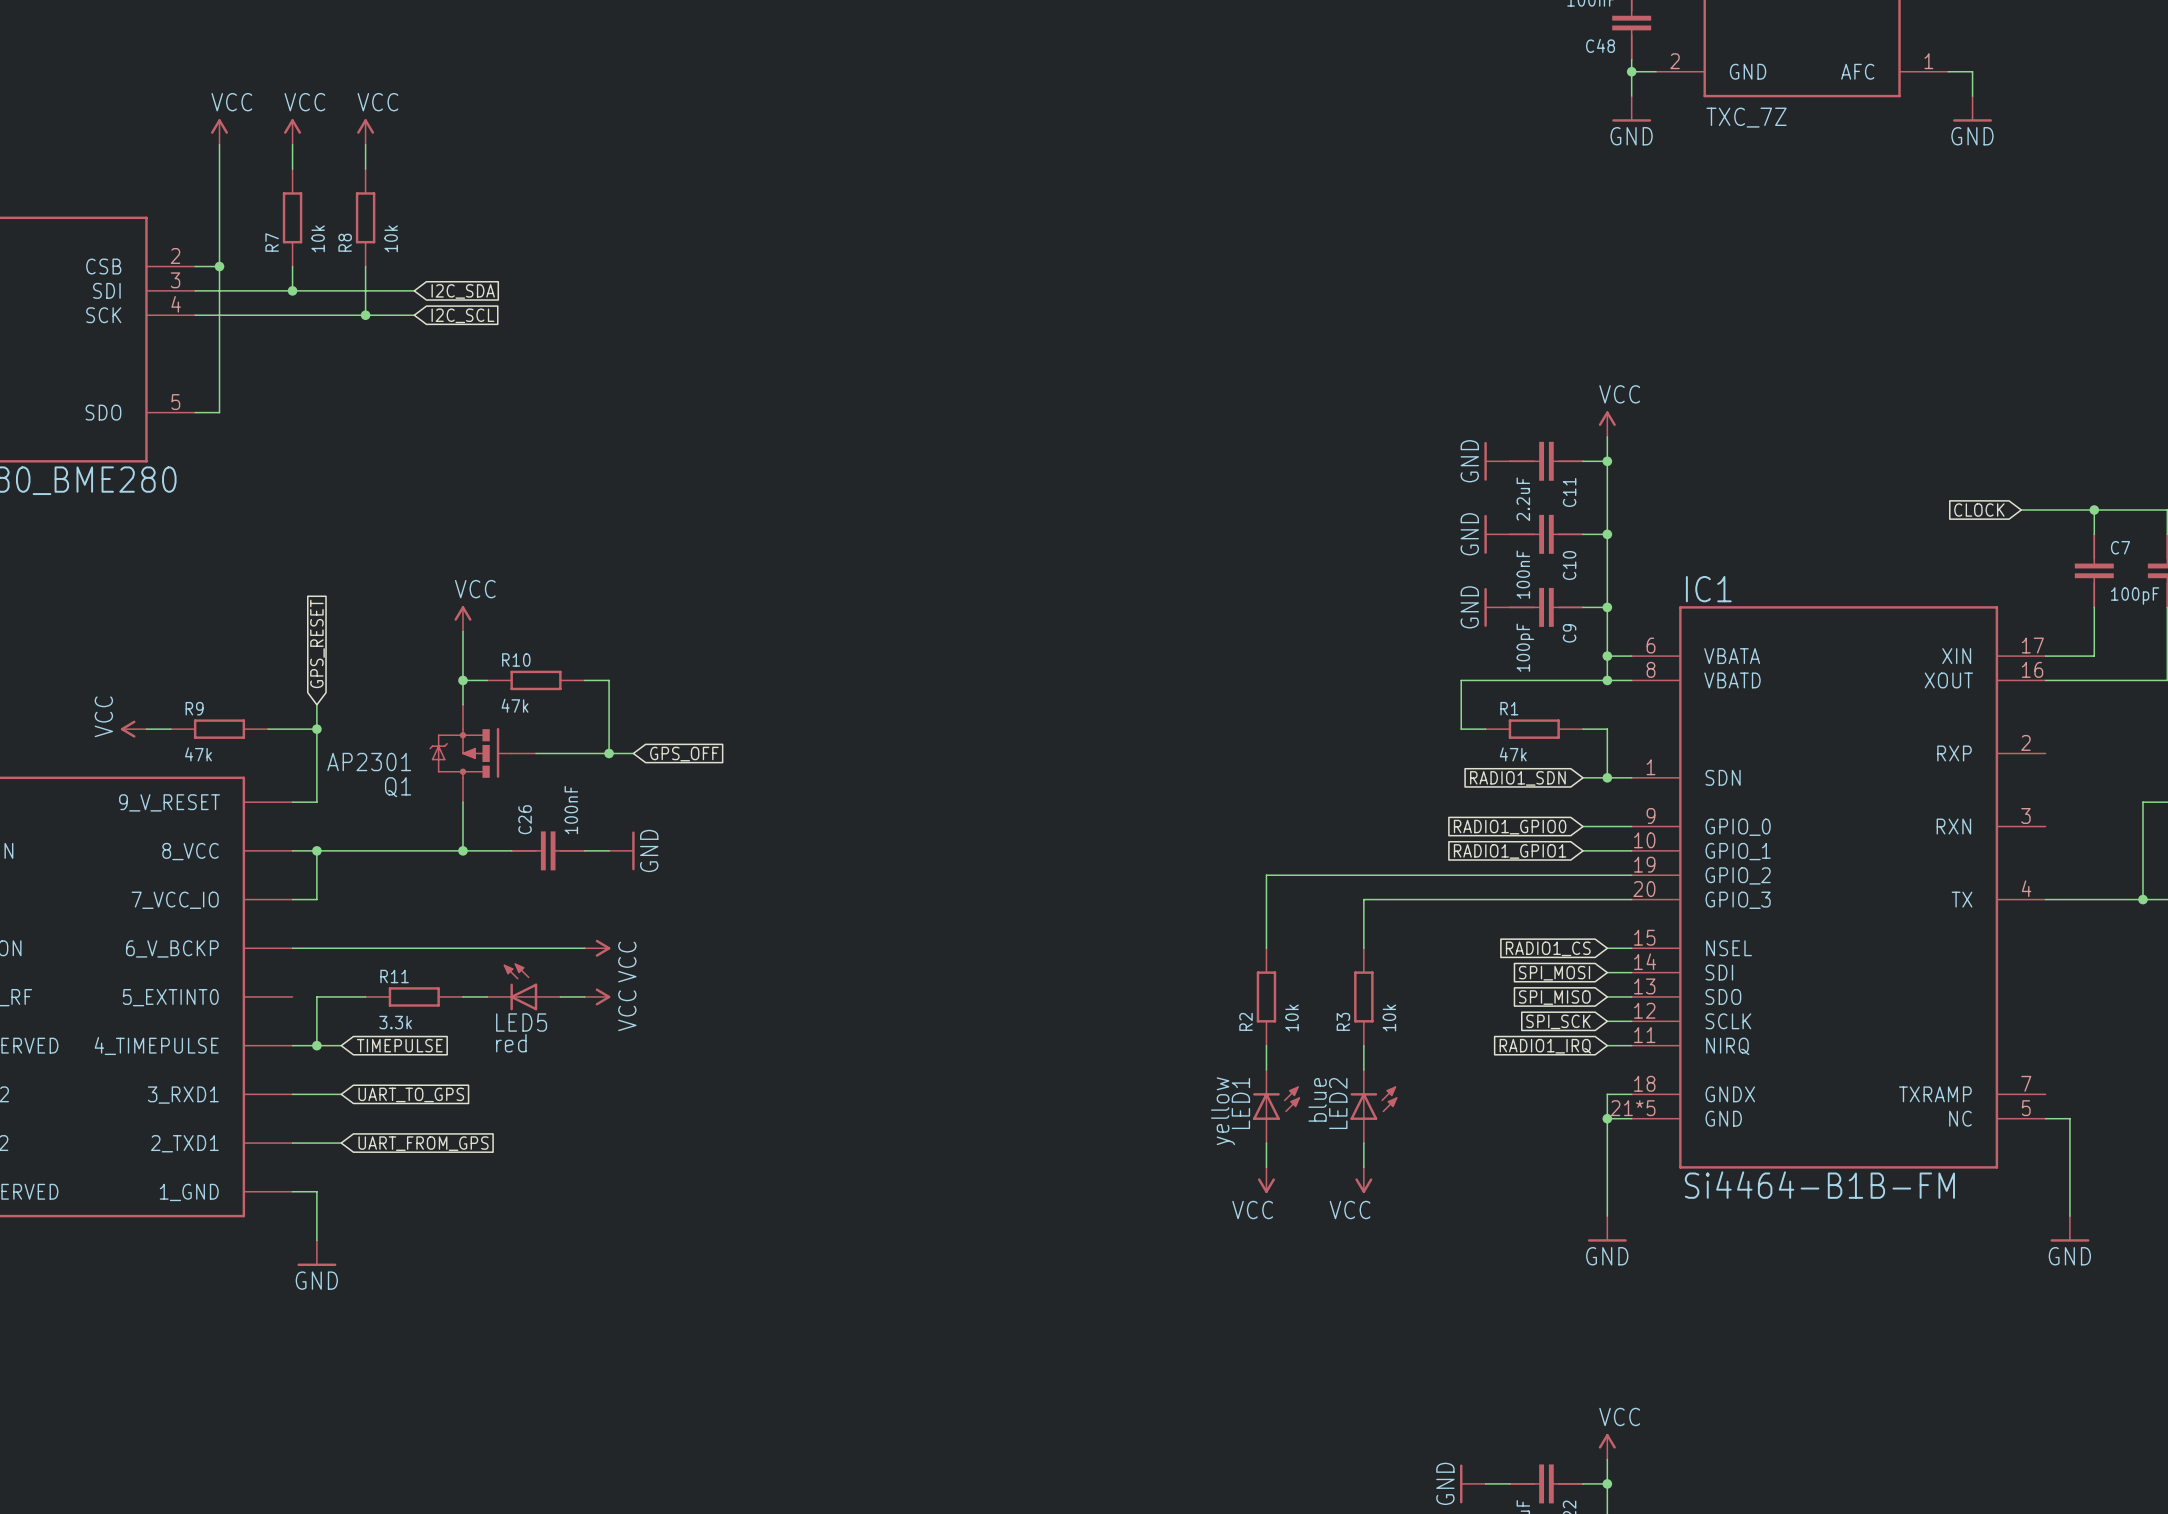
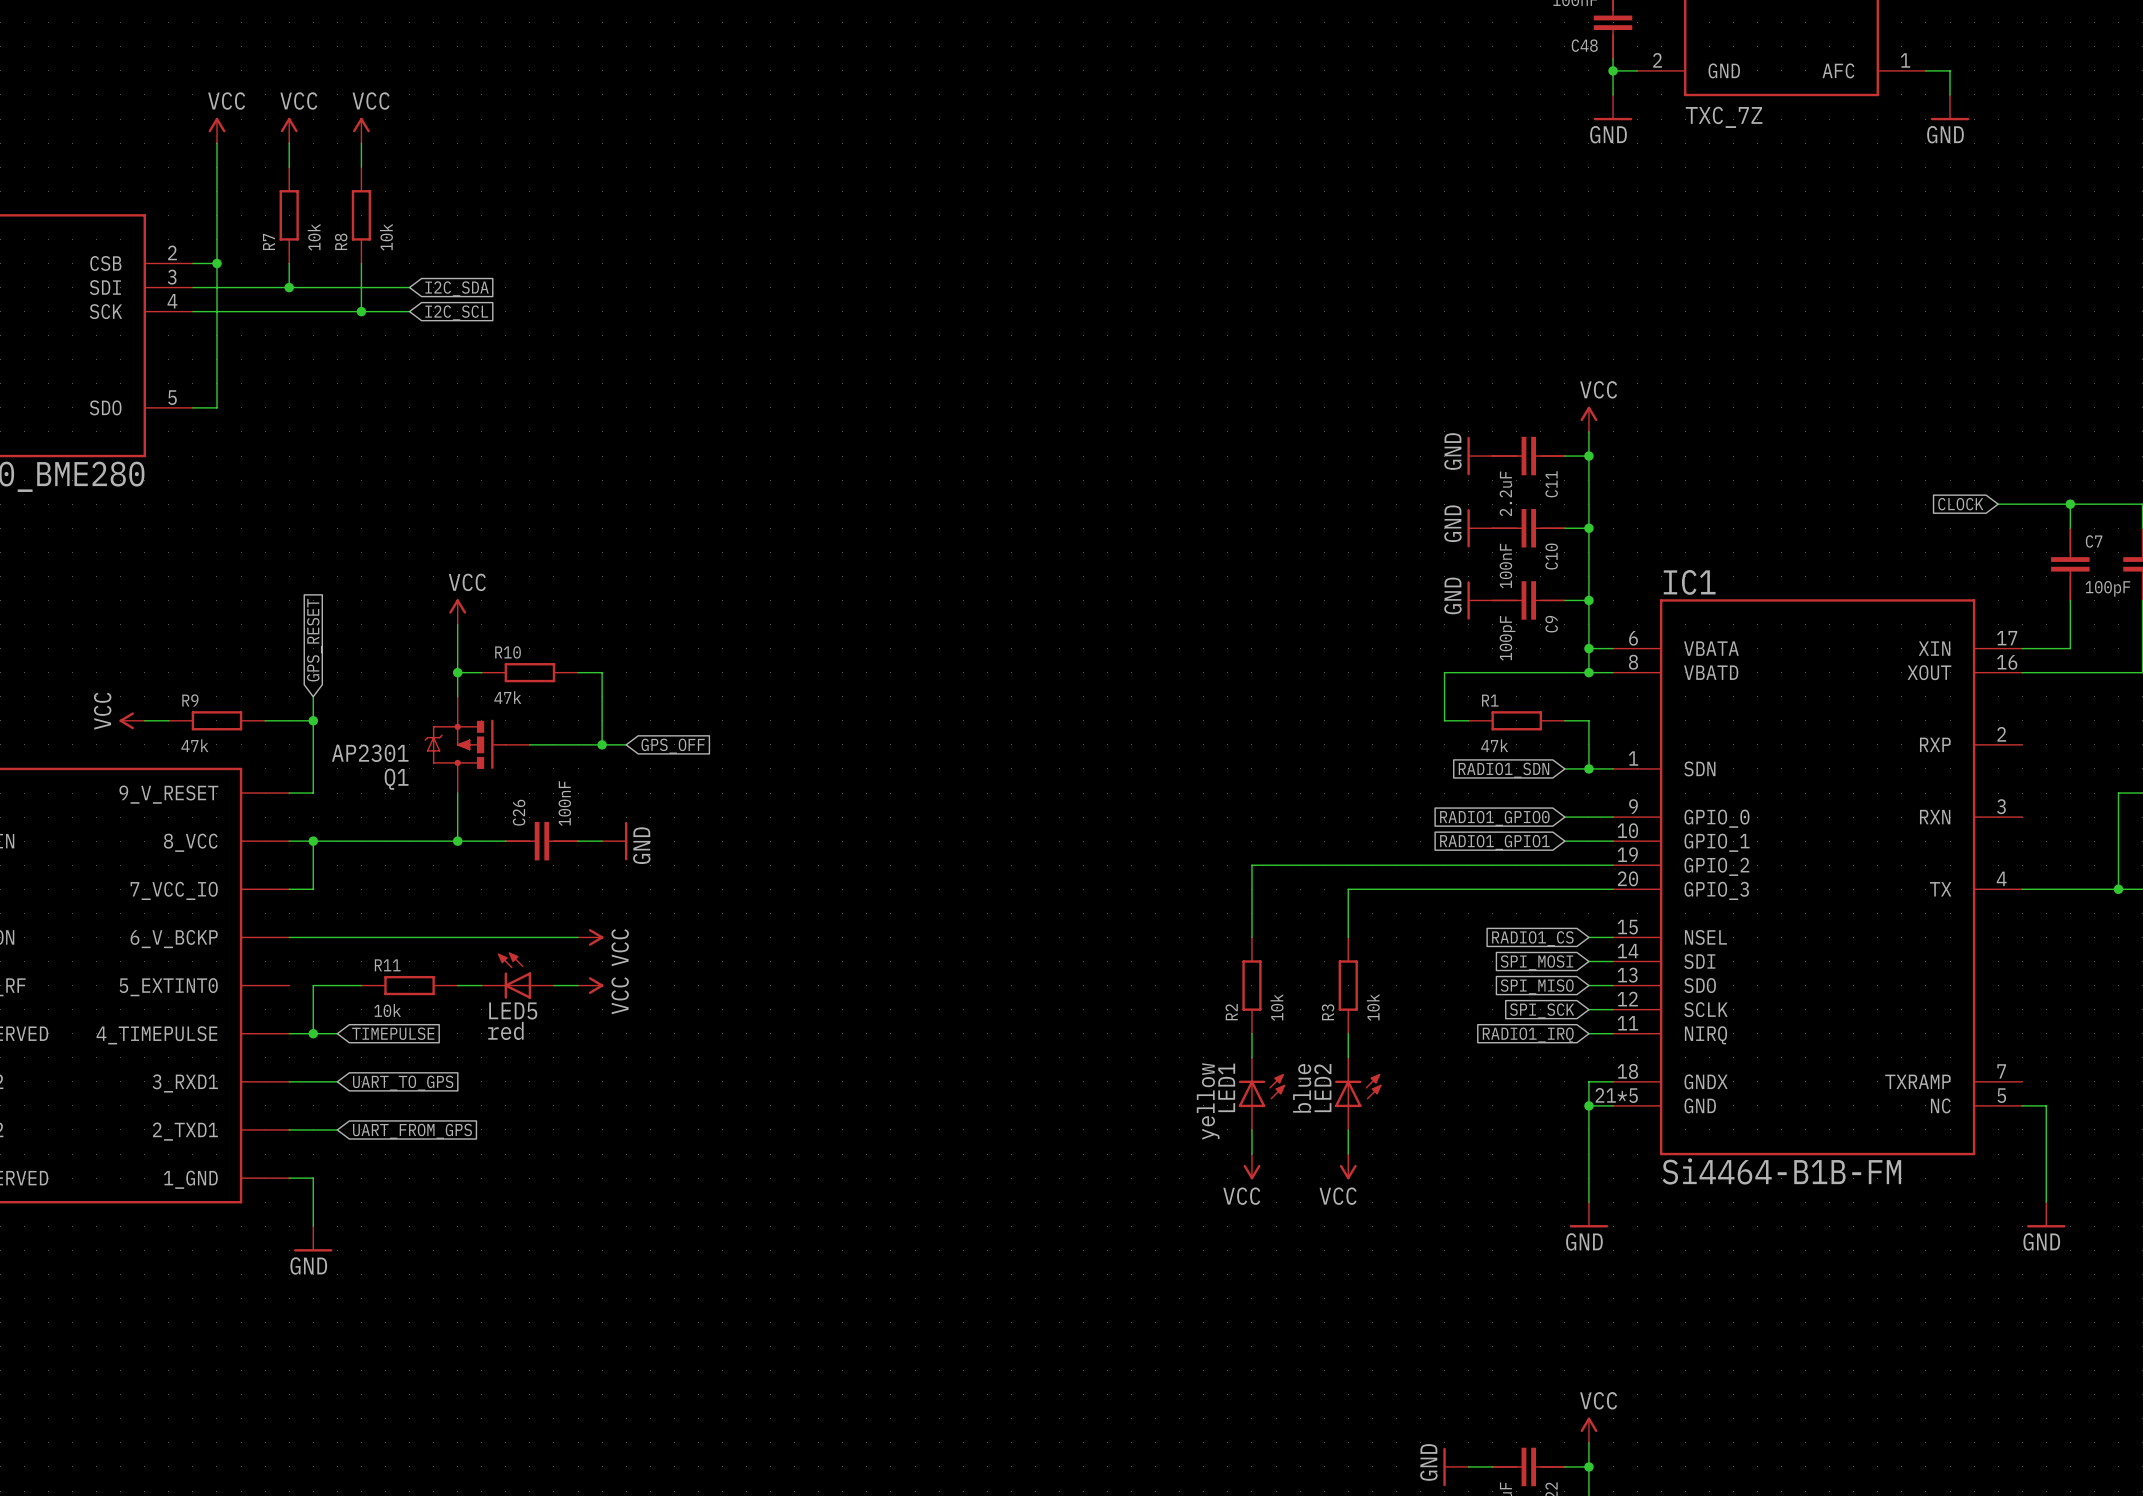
R11 value: 3.3k (395, 1022) -> 10k (387, 1010)

